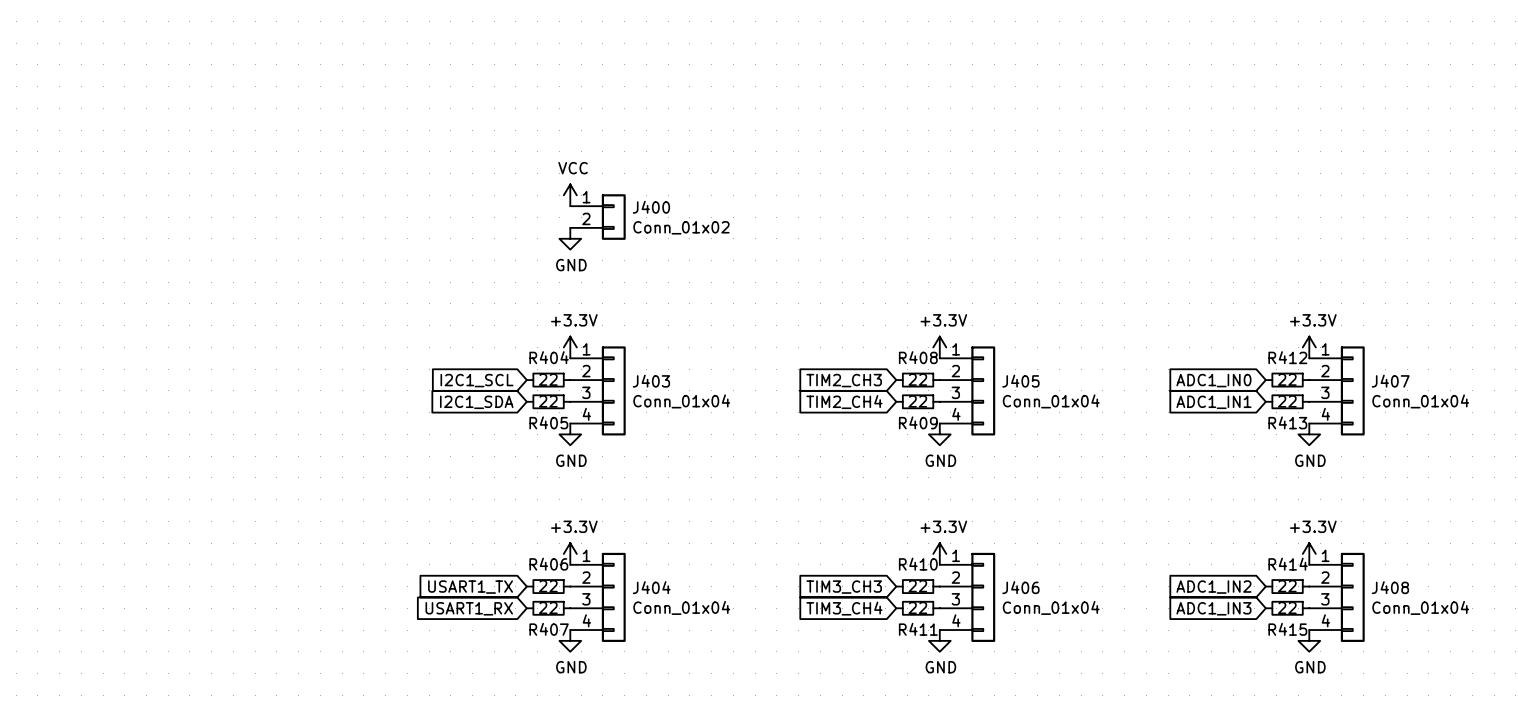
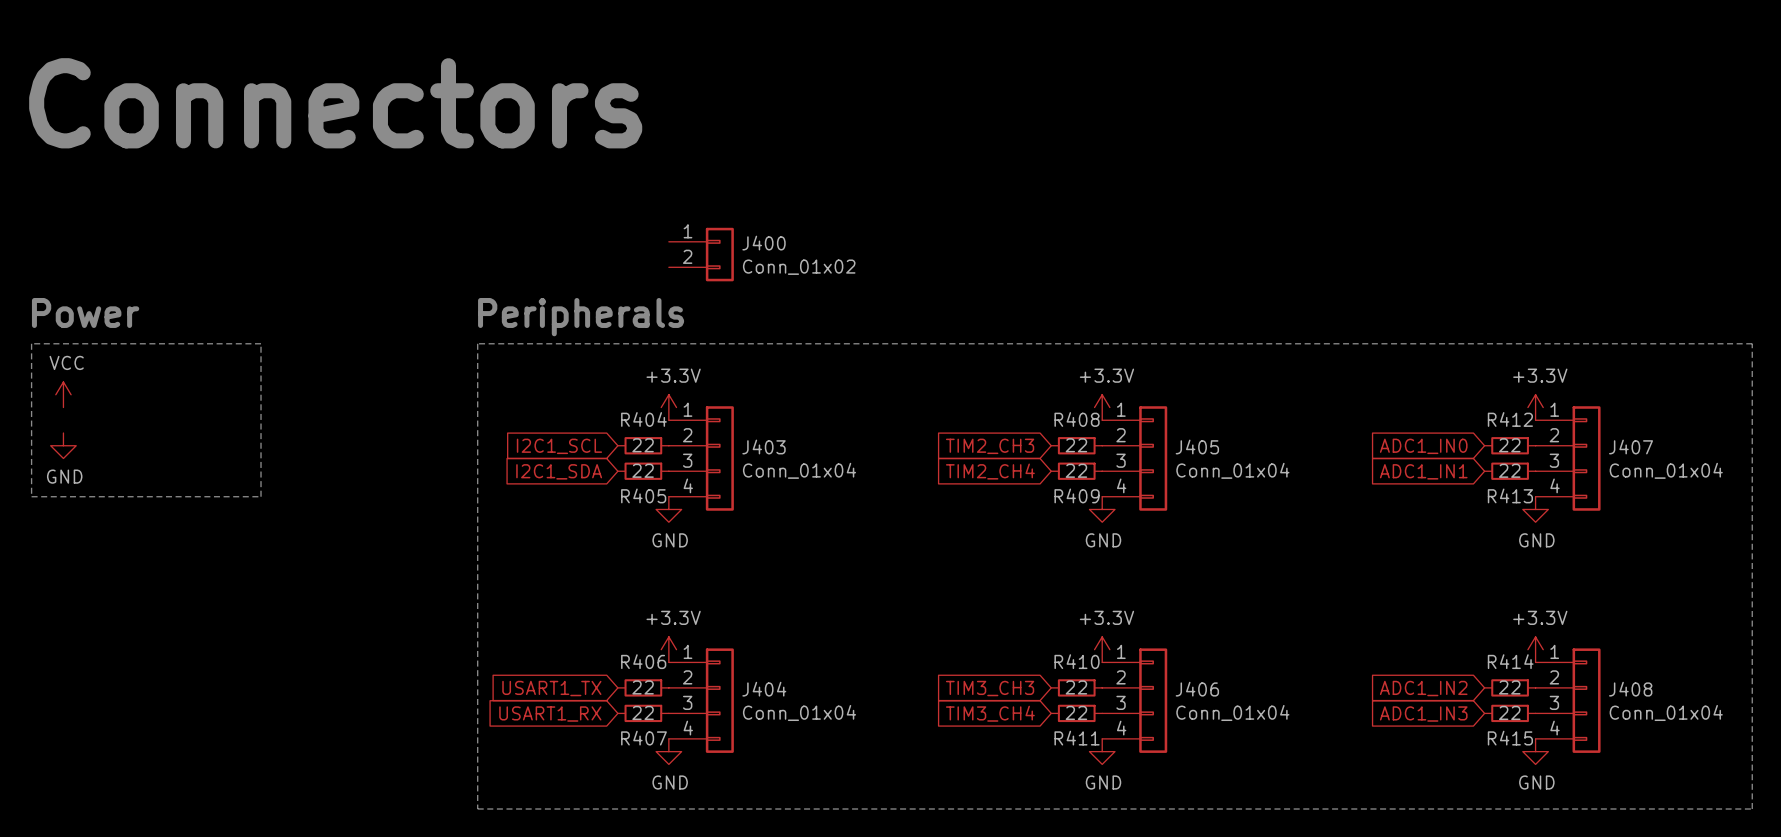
text: none -> Connectors (335, 103)
power symbol: VCC (570, 195) -> none
power symbol: GND (570, 238) -> none
text: none -> Power (85, 312)
text: none -> Peripherals (581, 317)
line: none -> (31, 343) (261, 343) (261, 496) (31, 496) (31, 343)
line: none -> (477, 343) (1752, 343) (1752, 809) (477, 809) (477, 343)
power symbol: none -> VCC (63, 394)
power symbol: none -> GND (63, 445)

